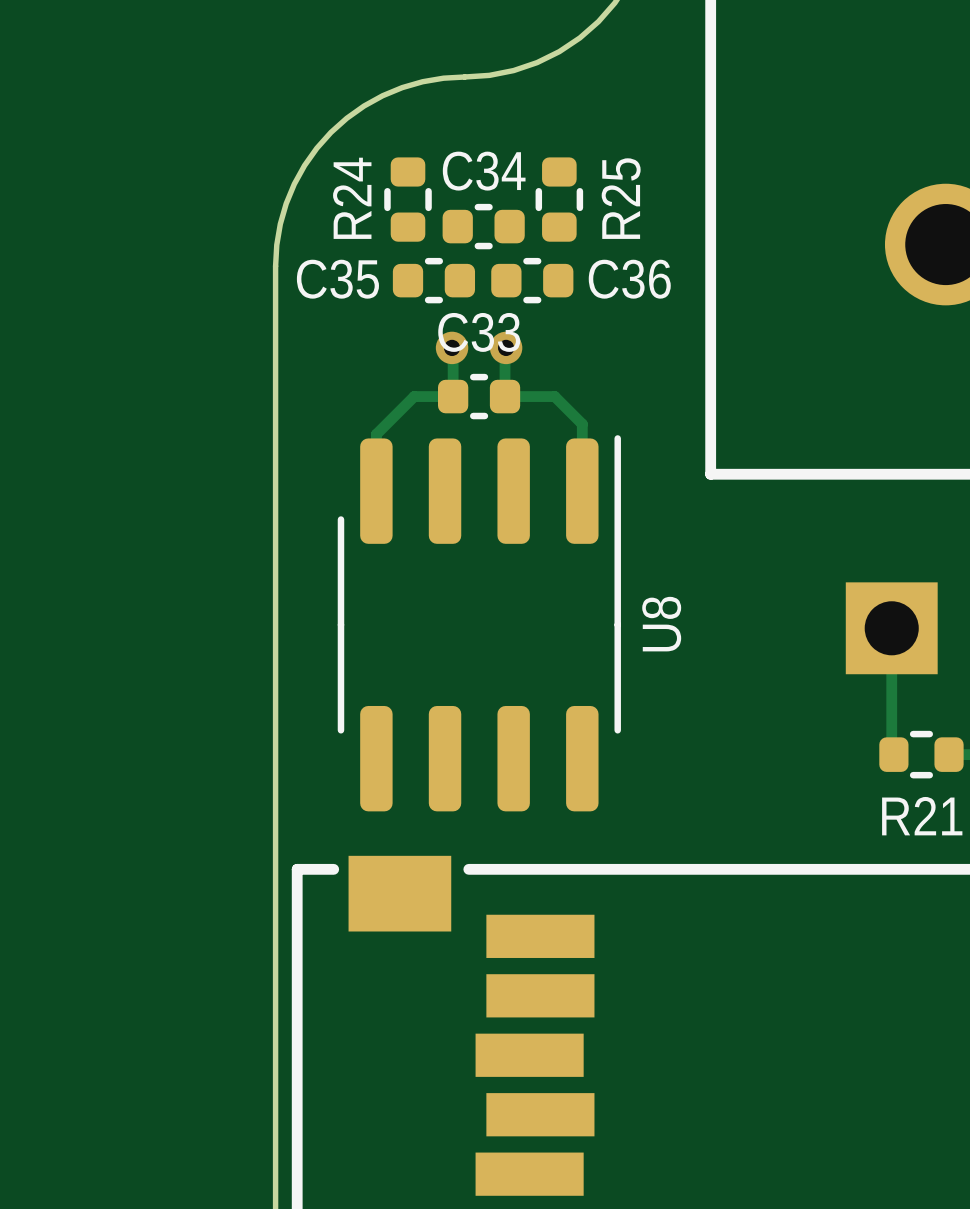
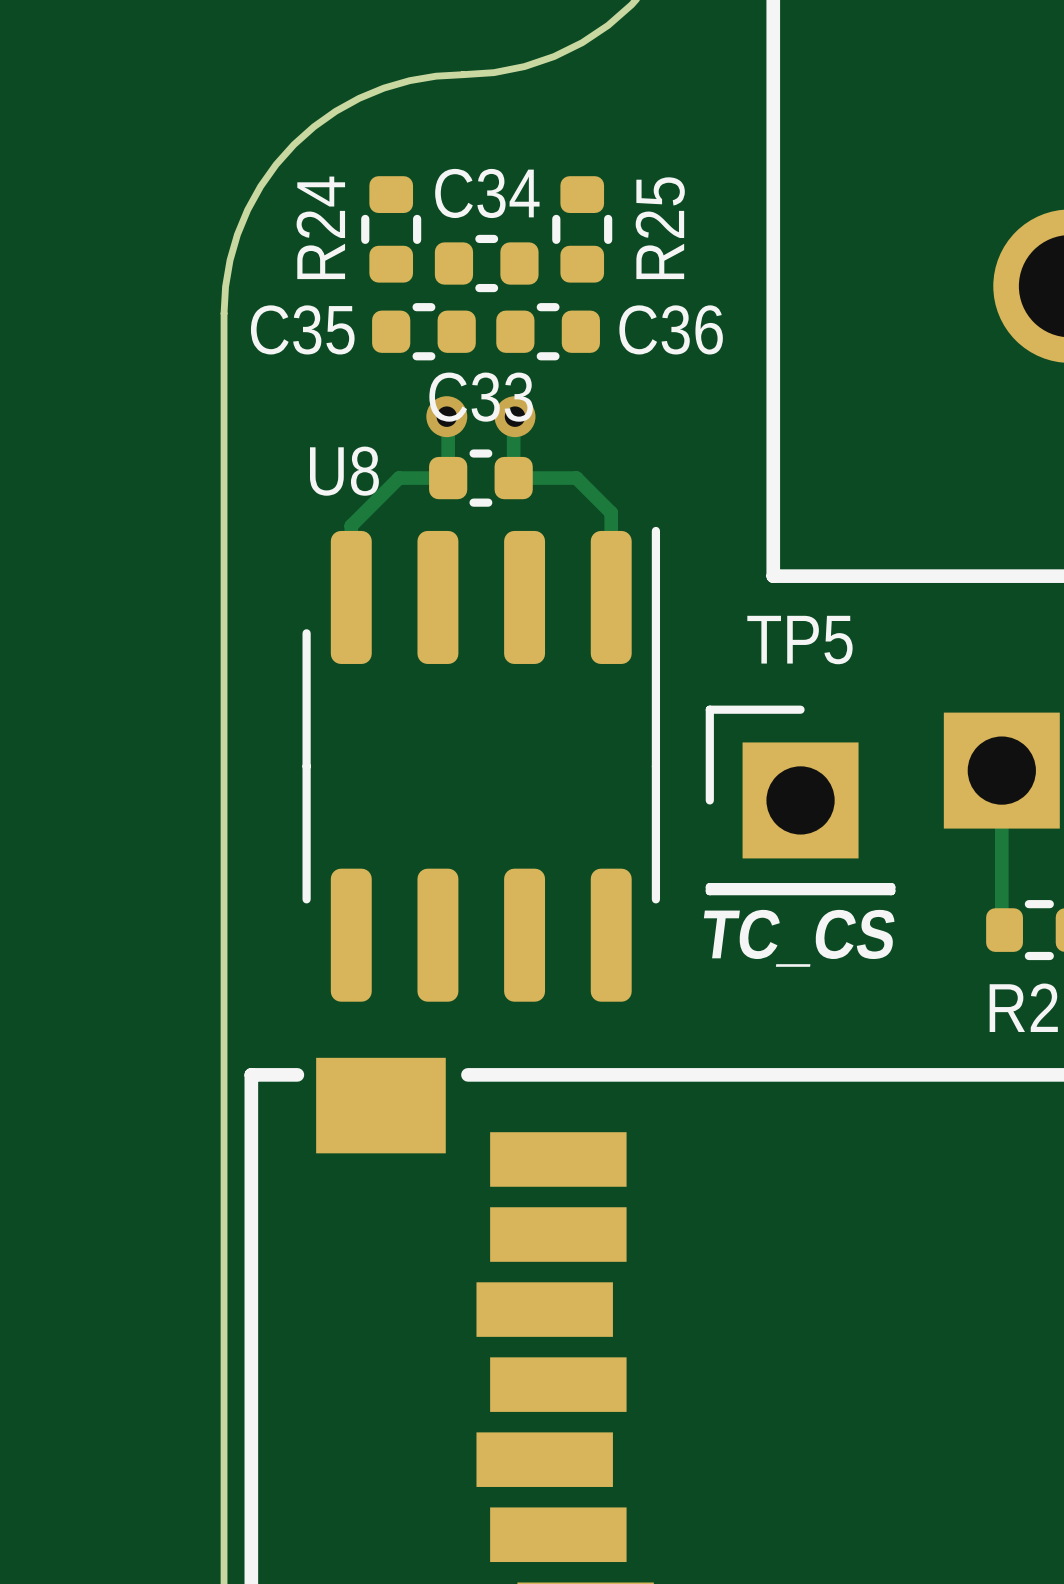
U8 name rotation: 0° (661, 624) -> 90° clockwise (344, 471)
U8 name position: U8 (661, 624) -> U8 (344, 471)
TP5: none -> (800, 800)
text: none -> TC_CS (799, 938)

